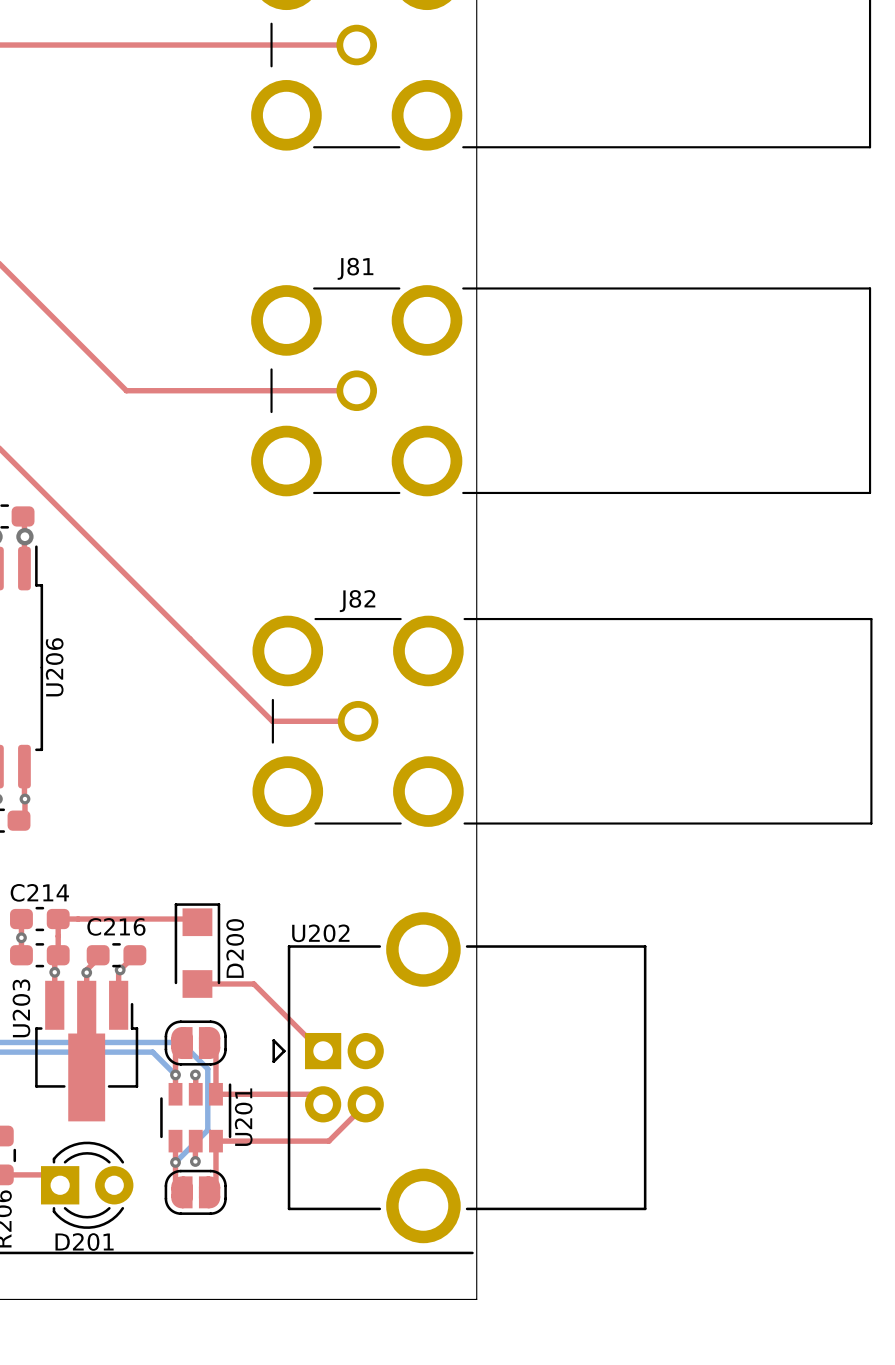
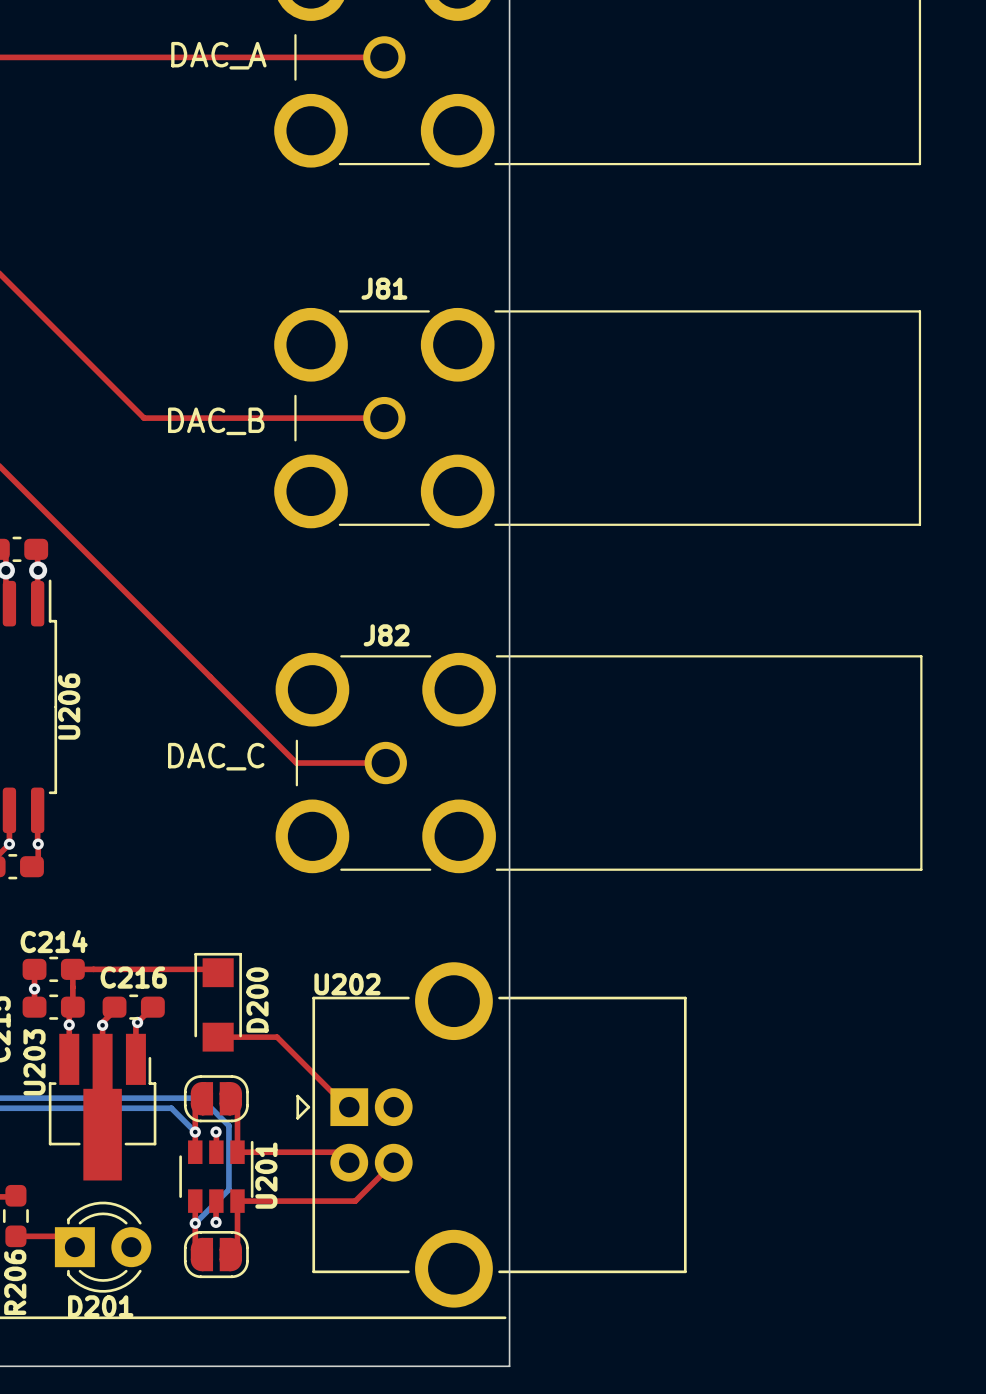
text: none -> DAC_A (218, 55)
text: none -> DAC_B (216, 421)
text: none -> DAC_C (216, 756)

